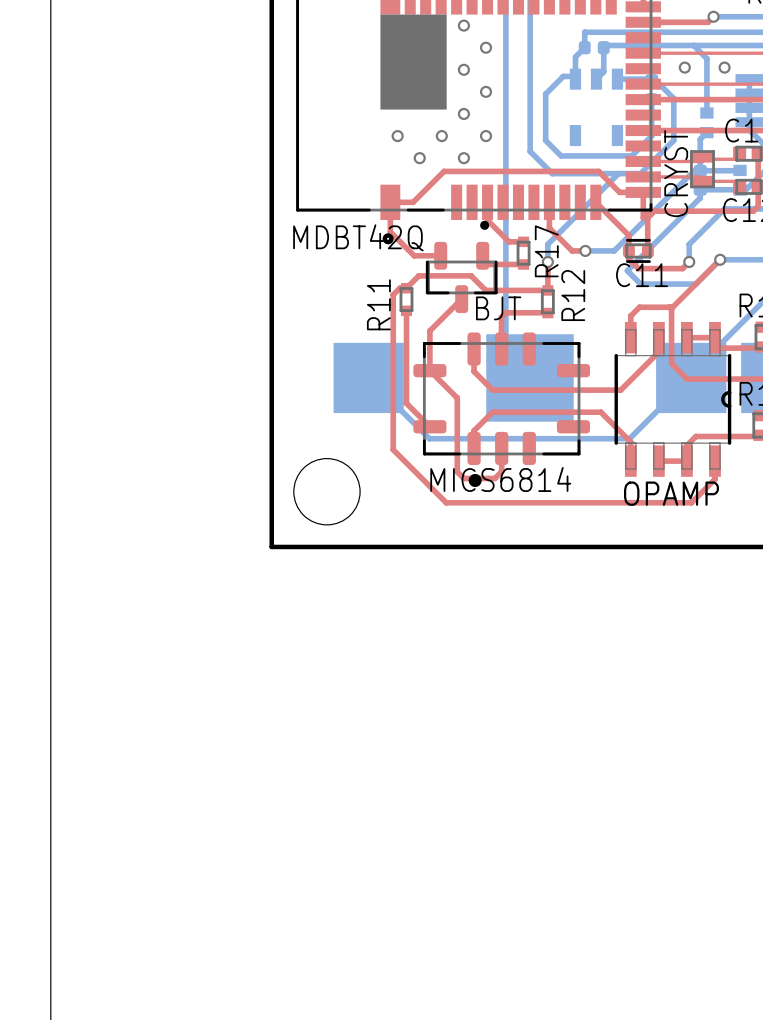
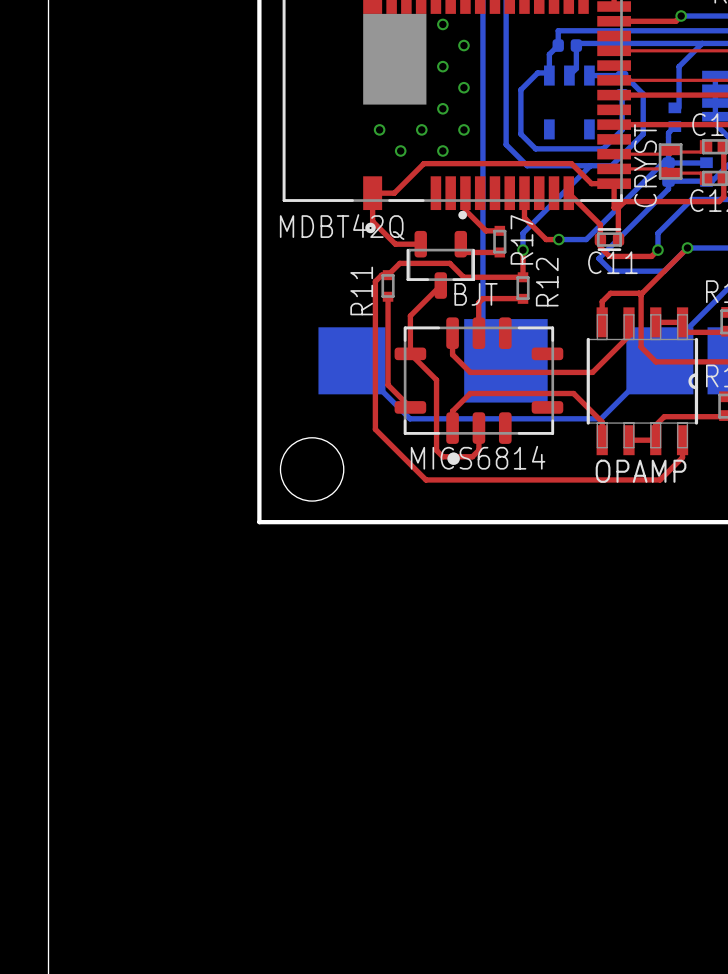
bottom track: (693, 45) (706, 58) (706, 112) -> none
bottom track: none -> (702, 43) (679, 66) (679, 107)
via: (684, 67) -> none
via: (724, 67) -> none

